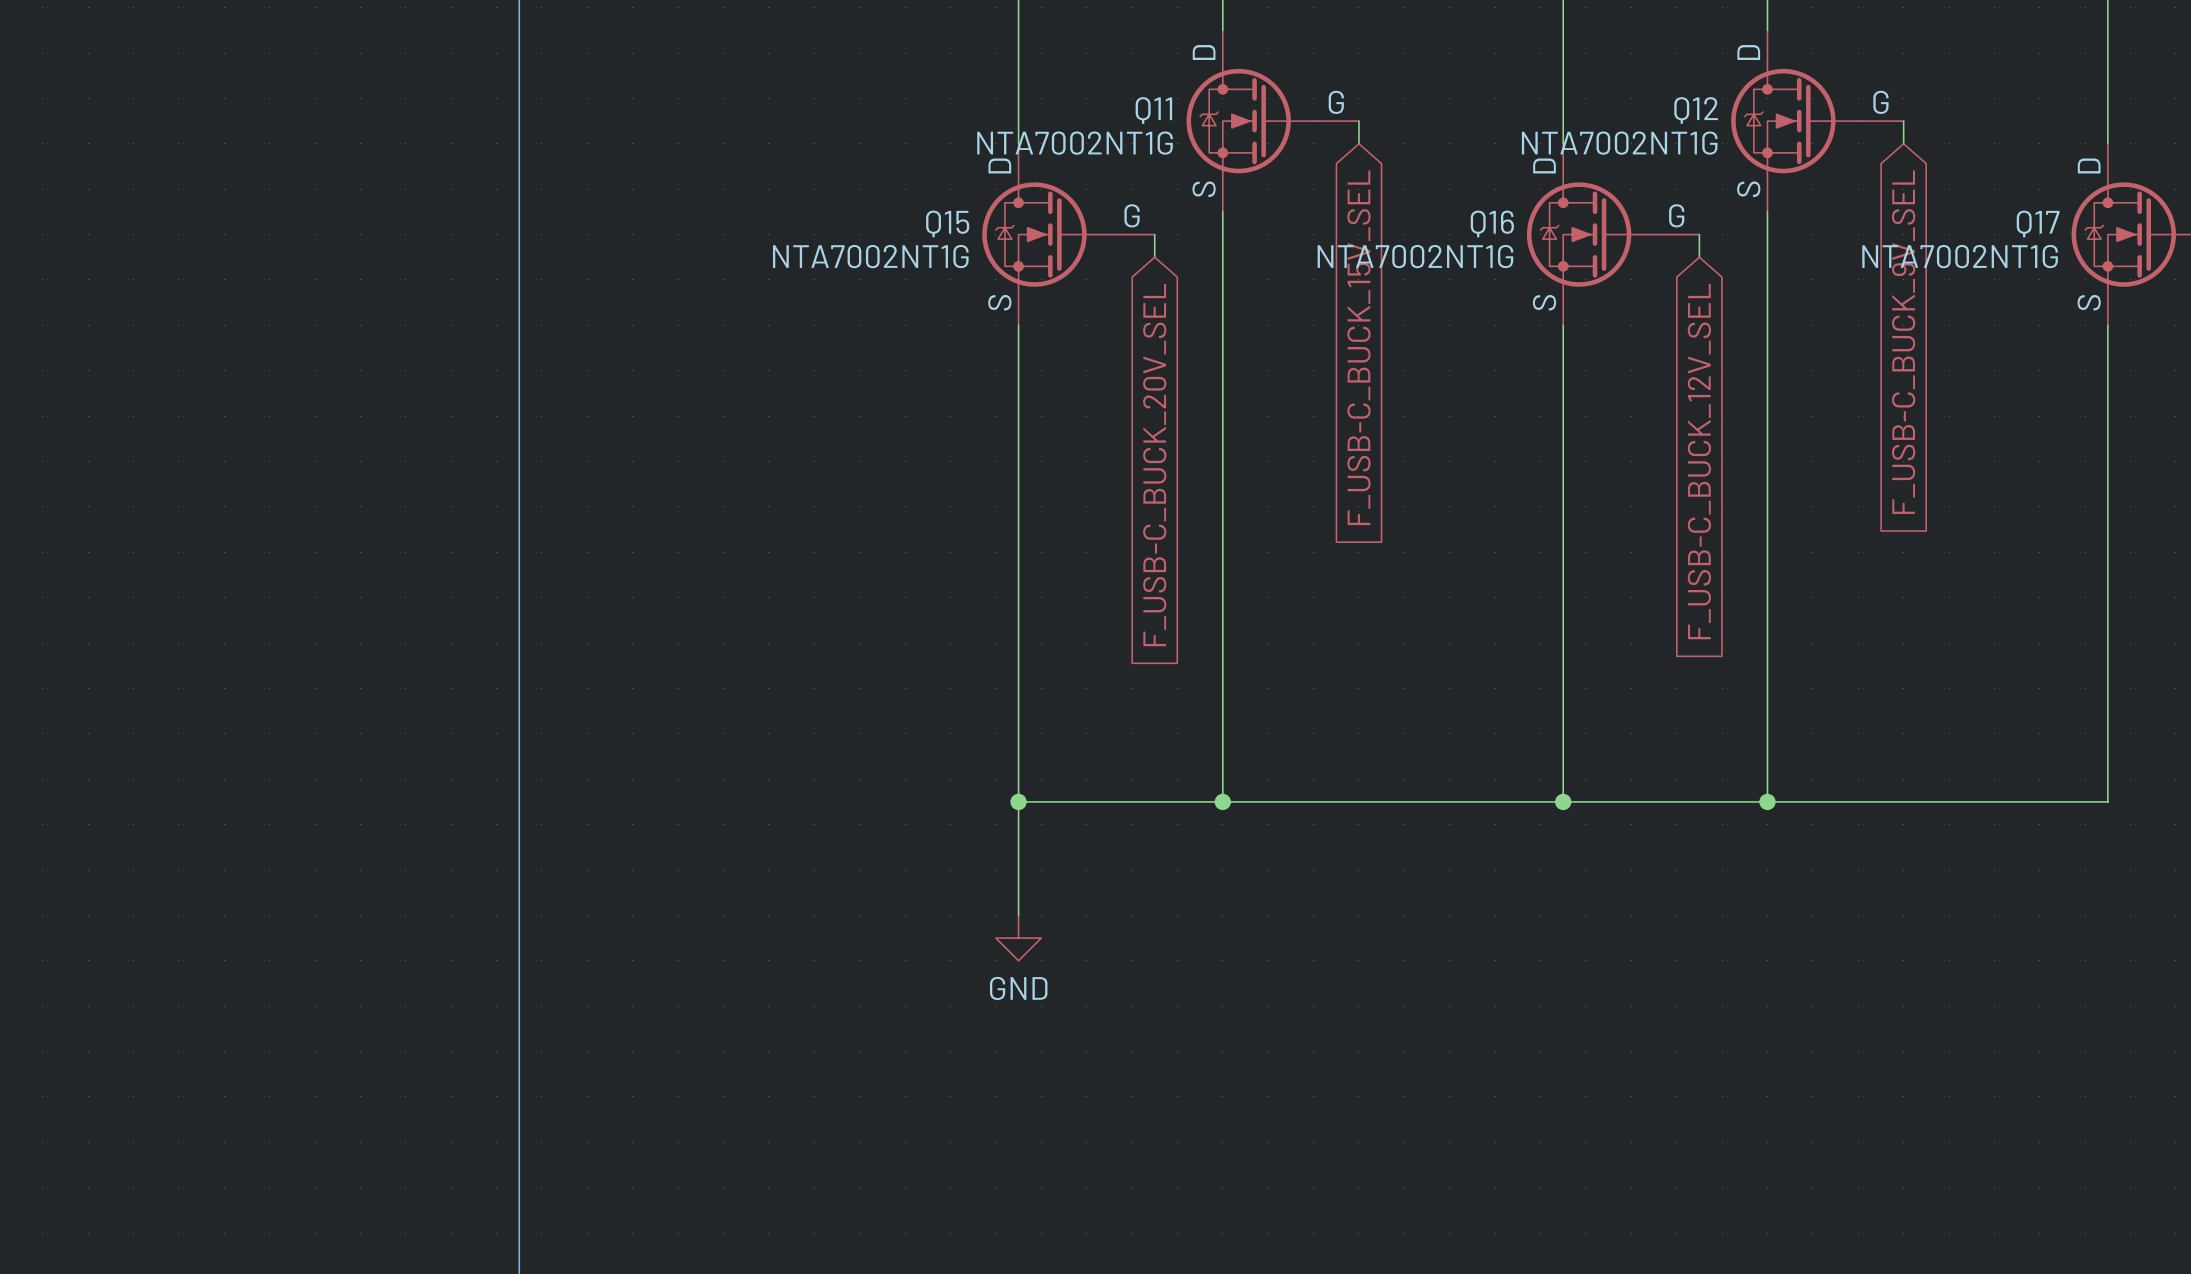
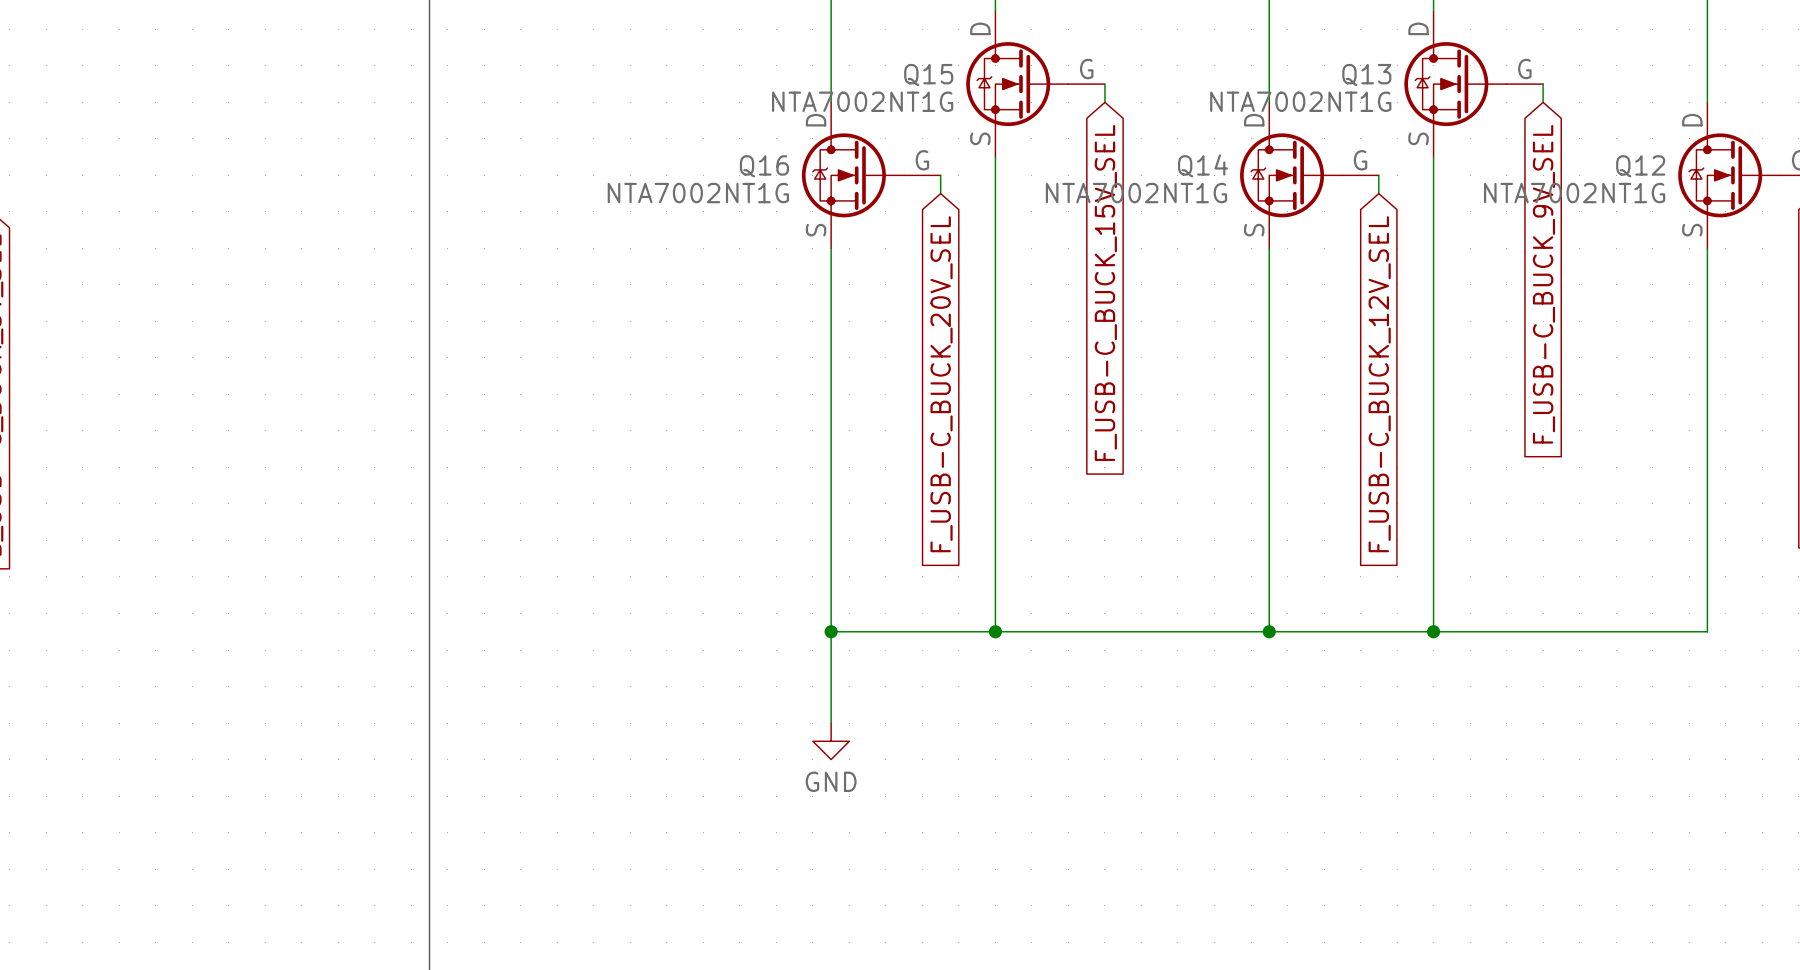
Q11 name: Q11 (1153, 110) -> Q15 (928, 75)
Q12 name: Q12 (1696, 110) -> Q13 (1366, 75)
Q15 name: Q15 (947, 223) -> Q16 (764, 166)
Q16 name: Q16 (1492, 223) -> Q14 (1202, 165)
Q17 name: Q17 (2038, 223) -> Q12 (1640, 166)

